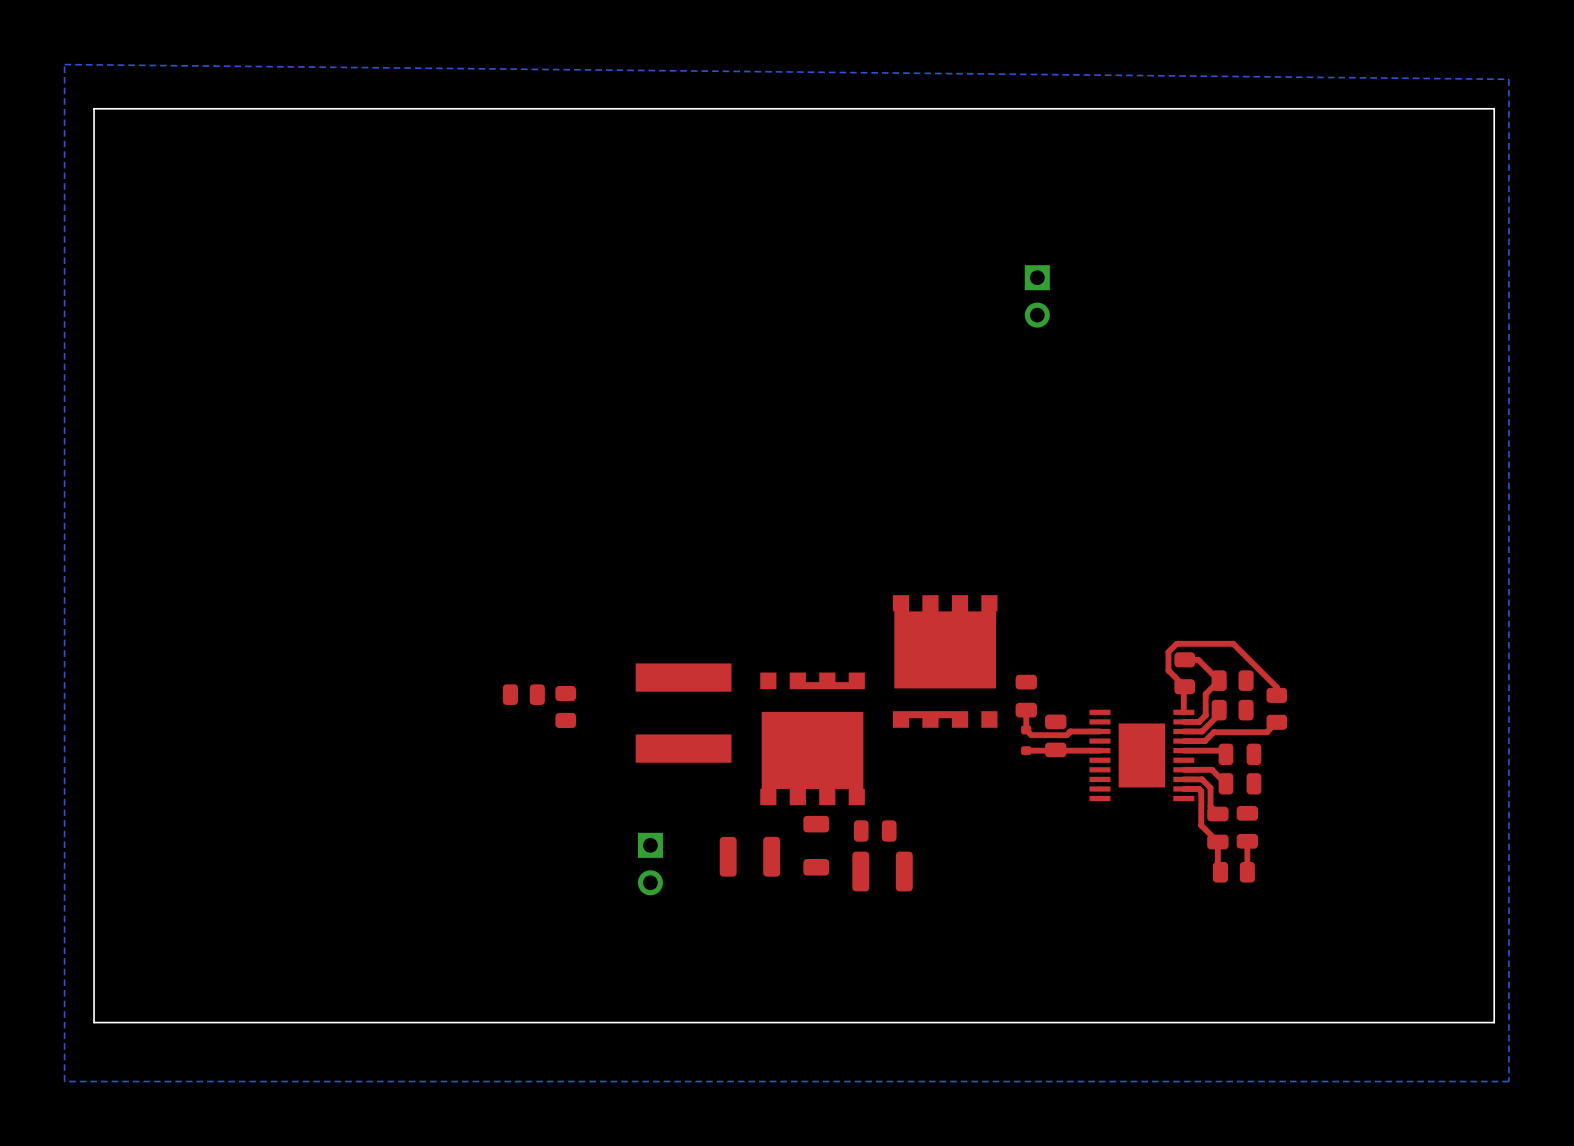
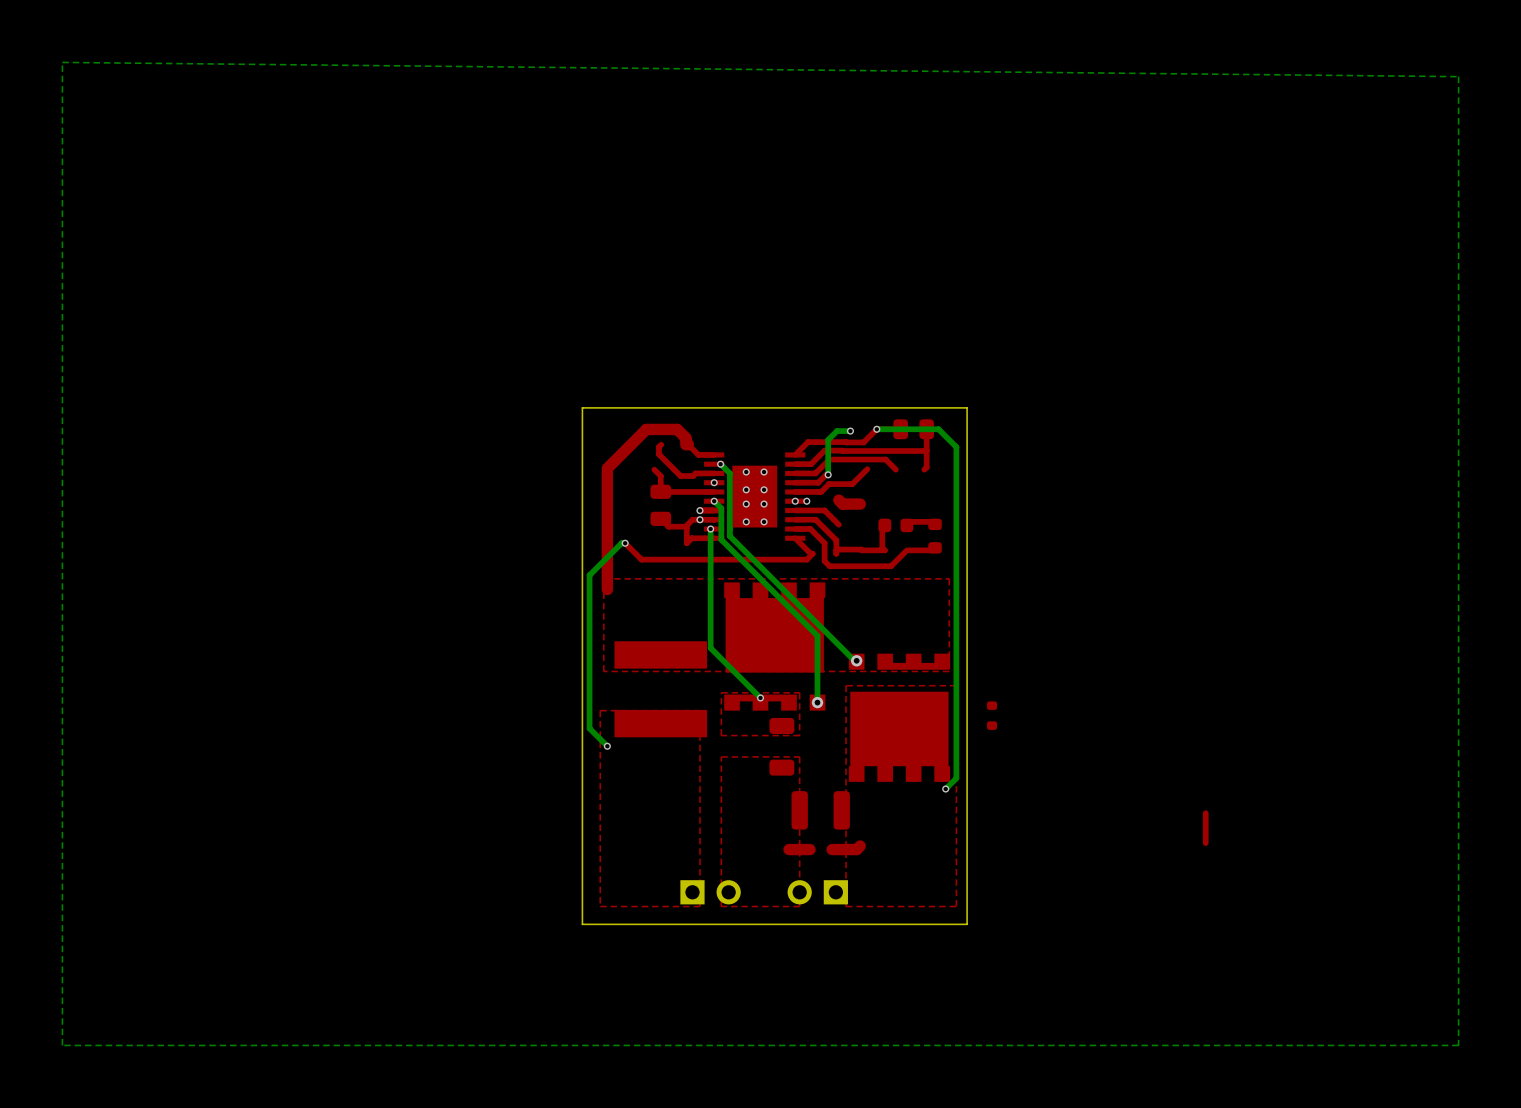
board edge: (1494, 108) (94, 108) (94, 1022) (1494, 1022) (1494, 108) -> none
part: (1037, 296) -> none
board edge: none -> (967, 407) (582, 407) (582, 924) (967, 924) (967, 407)
bottom track: none -> (876, 429) (938, 429) (956, 447) (956, 778) (945, 789)
via: none -> (876, 429)
top track: none -> (900, 429) (876, 429) (863, 442) (808, 442) (795, 454)
part: none -> (913, 429)
top track: none -> (926, 429) (926, 467) (924, 469)
bottom track: none -> (850, 431) (837, 431) (828, 439) (828, 474)
via: none -> (850, 431)
top track: none -> (688, 444) (698, 454) (714, 454)
top track: none -> (661, 444) (658, 447) (658, 454) (680, 476) (714, 473)
top track: none -> (685, 444) (685, 438) (677, 429) (646, 429) (607, 468)
top track: none -> (926, 450) (824, 450) (811, 464) (795, 464)
bottom track: none -> (720, 464) (729, 473) (729, 536) (854, 660) (856, 660)
via: none -> (720, 464)
top track: none -> (654, 469) (660, 476) (660, 491)
top track: none -> (867, 469) (852, 484) (828, 484) (821, 491) (795, 491)
top track: none -> (895, 469) (885, 459) (829, 459) (815, 473) (795, 473)
top track: none -> (607, 472) (607, 589)
via: none -> (746, 472)
via: none -> (764, 472)
top track: none -> (828, 474) (818, 482) (795, 482)
via: none -> (828, 474)
via: none -> (714, 482)
via: none -> (746, 489)
via: none -> (764, 489)
top track: none -> (714, 491) (660, 491)
part: none -> (754, 496)
top track: none -> (838, 500) (842, 504) (860, 504)
bottom track: none -> (714, 501) (721, 508) (721, 539) (817, 635) (817, 702)
via: none -> (714, 501)
via: none -> (795, 501)
via: none -> (806, 501)
via: none -> (746, 504)
via: none -> (764, 504)
part: none -> (660, 505)
via: none -> (699, 510)
top track: none -> (795, 510) (824, 510) (838, 524)
top track: none -> (660, 518) (668, 526) (685, 526)
via: none -> (699, 519)
top track: none -> (714, 519) (692, 519) (685, 526)
top track: none -> (795, 519) (815, 519) (836, 540) (836, 553)
via: none -> (746, 521)
via: none -> (764, 521)
top track: none -> (882, 521) (882, 547) (884, 550) (836, 550)
top track: none -> (909, 521) (932, 521) (935, 524)
part: none -> (895, 525)
top track: none -> (685, 526) (686, 543) (691, 538) (714, 538)
via: none -> (710, 529)
top track: none -> (795, 529) (810, 529) (824, 543) (824, 561) (829, 566) (891, 566) (906, 550)
bottom track: none -> (710, 532) (710, 648) (760, 697)
part: none -> (935, 536)
top track: none -> (795, 538) (812, 553) (806, 559) (641, 559) (624, 543)
bottom track: none -> (625, 543) (621, 543) (589, 575) (589, 728) (607, 746)
via: none -> (625, 543)
top track: none -> (935, 547) (932, 550) (909, 550)
top zone outline: none -> (949, 578) (603, 578) (603, 671) (949, 671) (949, 578)
top track: (1184, 659) (1198, 659) (1219, 680) (1205, 694) (1205, 715) (1199, 721) (1183, 721) -> none
part: (945, 661) -> none
part: none -> (774, 646)
part: (1184, 673) -> none
part: (1232, 680) -> none
via: none -> (856, 660)
top track: (1183, 684) (1183, 712) -> none
top track: (1184, 686) (1168, 670) (1168, 651) (1176, 643) (1233, 643) (1276, 687) (1276, 695) -> none
part: (523, 694) -> none
part: (1026, 696) -> none
part: (565, 706) -> none
part: (1276, 708) -> none
top zone outline: none -> (956, 685) (956, 906) (845, 906) (845, 685) (956, 685)
top track: (1026, 710) (1026, 730) (1031, 735) (1066, 735) (1070, 731) (1099, 731) -> none
top track: (1219, 710) (1219, 714) (1202, 731) (1183, 731) -> none
part: (1232, 710) -> none
top zone outline: none -> (799, 692) (799, 735) (721, 735) (721, 692) (799, 692)
via: none -> (760, 697)
top track: (1276, 722) (1266, 732) (1213, 732) (1204, 741) (1183, 741) -> none
via: none -> (817, 702)
top zone outline: none -> (699, 710) (600, 710) (600, 906) (699, 906) (699, 710)
part: (1055, 735) -> none
part: (812, 738) -> none
part: none -> (899, 717)
top track: (1099, 750) (1026, 750) -> none
top track: (1183, 750) (1222, 750) (1225, 754) -> none
part: (1239, 754) -> none
part: (1141, 755) -> none
top track: (1183, 769) (1211, 769) (1225, 783) -> none
via: none -> (607, 746)
top track: (1183, 779) (1202, 779) (1210, 787) (1210, 806) (1217, 814) -> none
top zone outline: none -> (799, 756) (799, 906) (721, 906) (721, 756) (799, 756)
part: (1239, 783) -> none
top track: (1183, 788) (1199, 788) (1201, 791) (1201, 825) (1217, 842) (1217, 869) (1220, 872) -> none
via: none -> (945, 789)
part: (1247, 827) -> none
part: (1217, 828) -> none
part: (875, 830) -> none
part position: (816, 845) -> (781, 746)
part: (749, 856) -> none
part: (650, 864) -> none
part position: (882, 871) -> (820, 810)
part: (1233, 872) -> none
top track: none -> (860, 845) (856, 849) (832, 849)
top track: none -> (810, 849) (789, 849)
part: none -> (710, 892)
part: none -> (817, 892)

